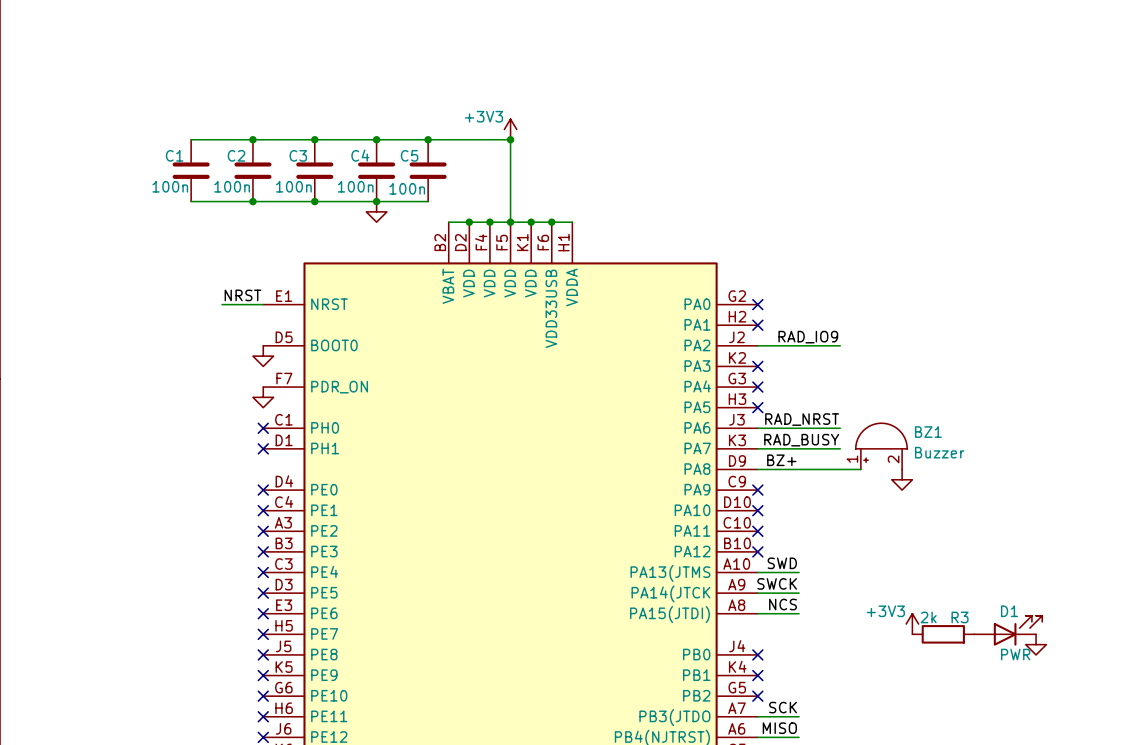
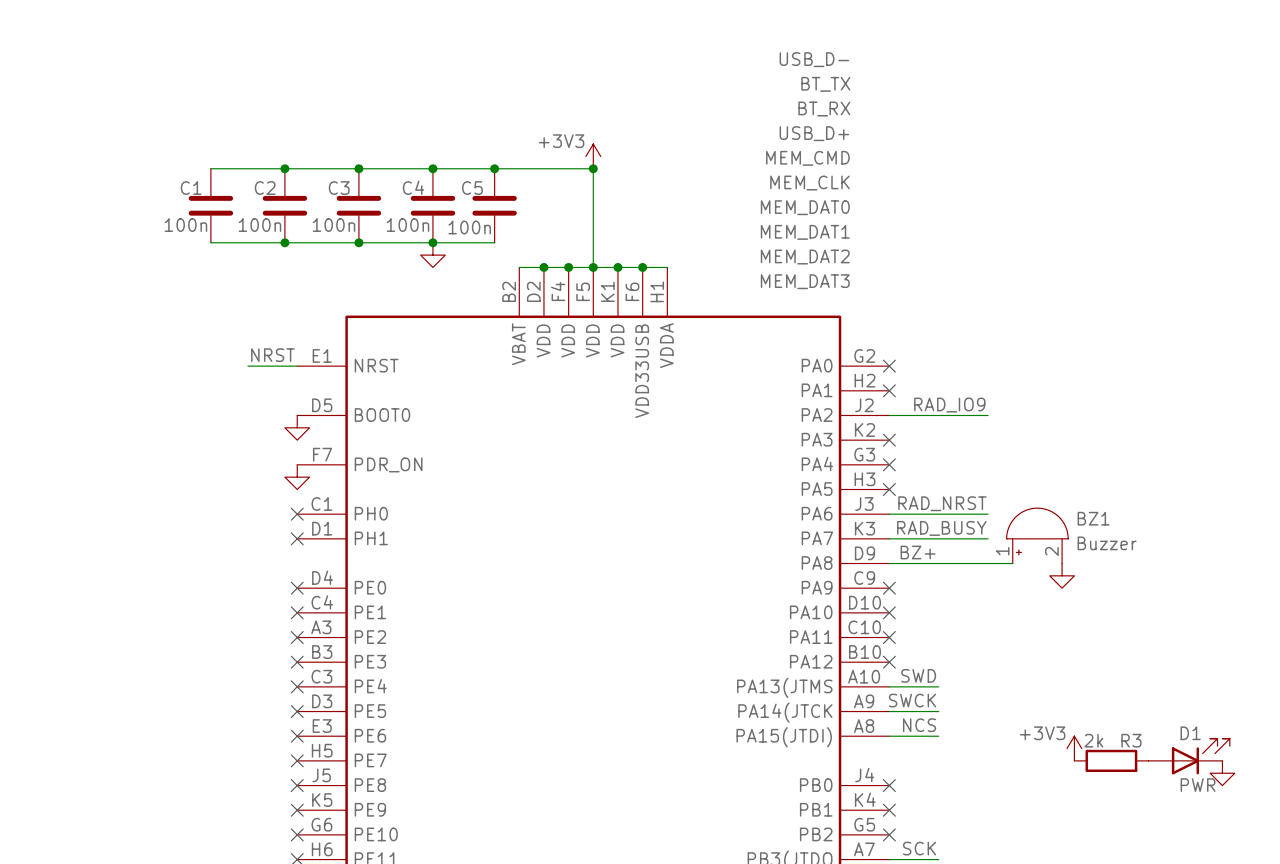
label: none -> USB_D- (814, 59)
label: none -> BT_TX (825, 84)
label: none -> BT_RX (824, 109)
label: none -> USB_D+ (814, 133)
label: none -> MEM_CMD (807, 158)
label: none -> MEM_CLK (809, 183)
label: none -> MEM_DAT0 (805, 207)
label: none -> MEM_DAT1 (805, 232)
label: none -> MEM_DAT2 (805, 257)
label: none -> MEM_DAT3 (805, 281)

